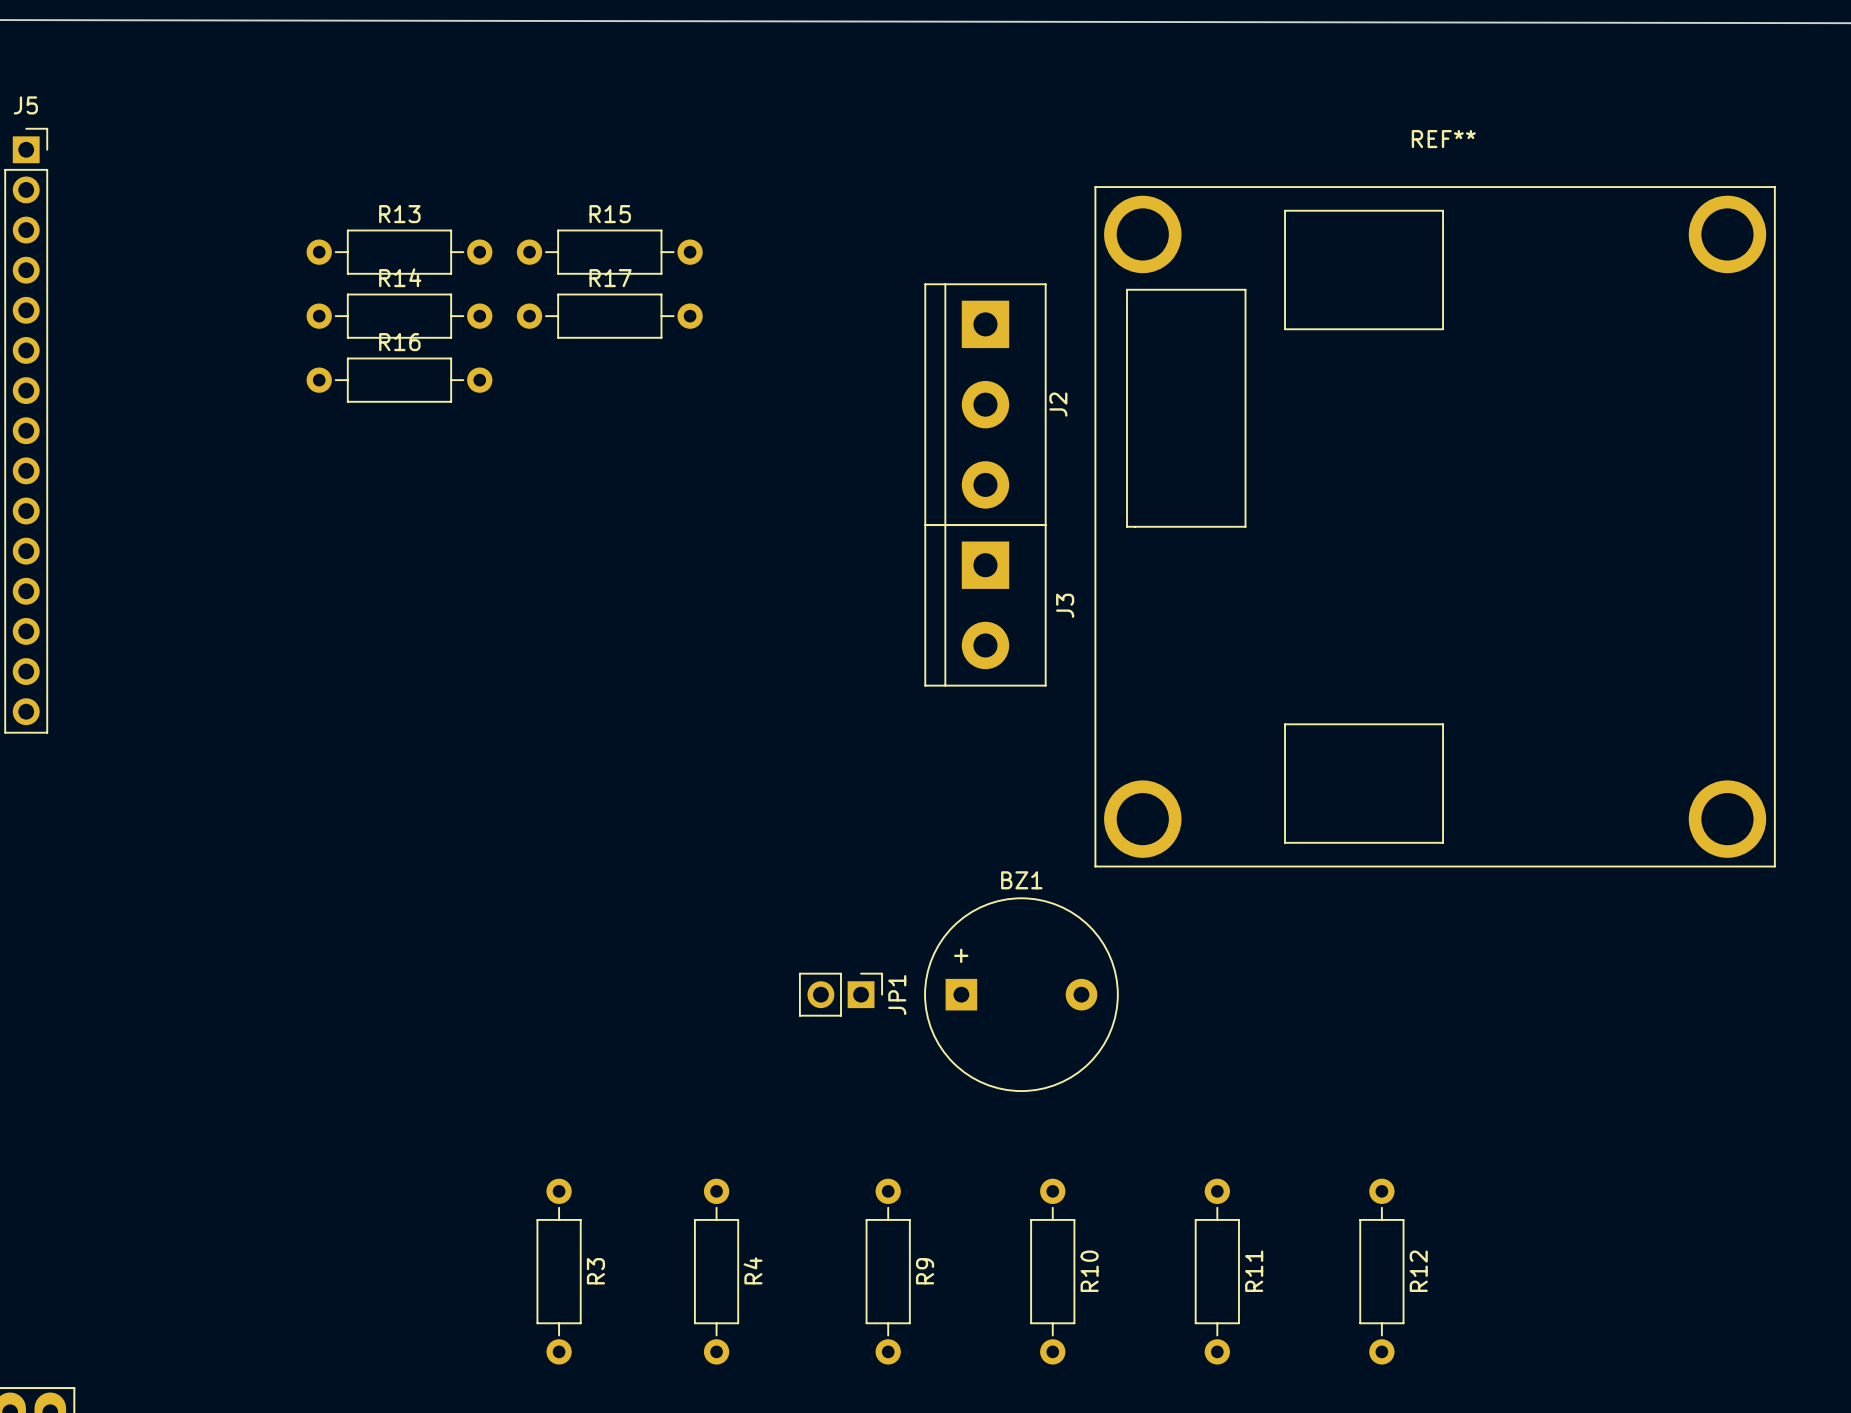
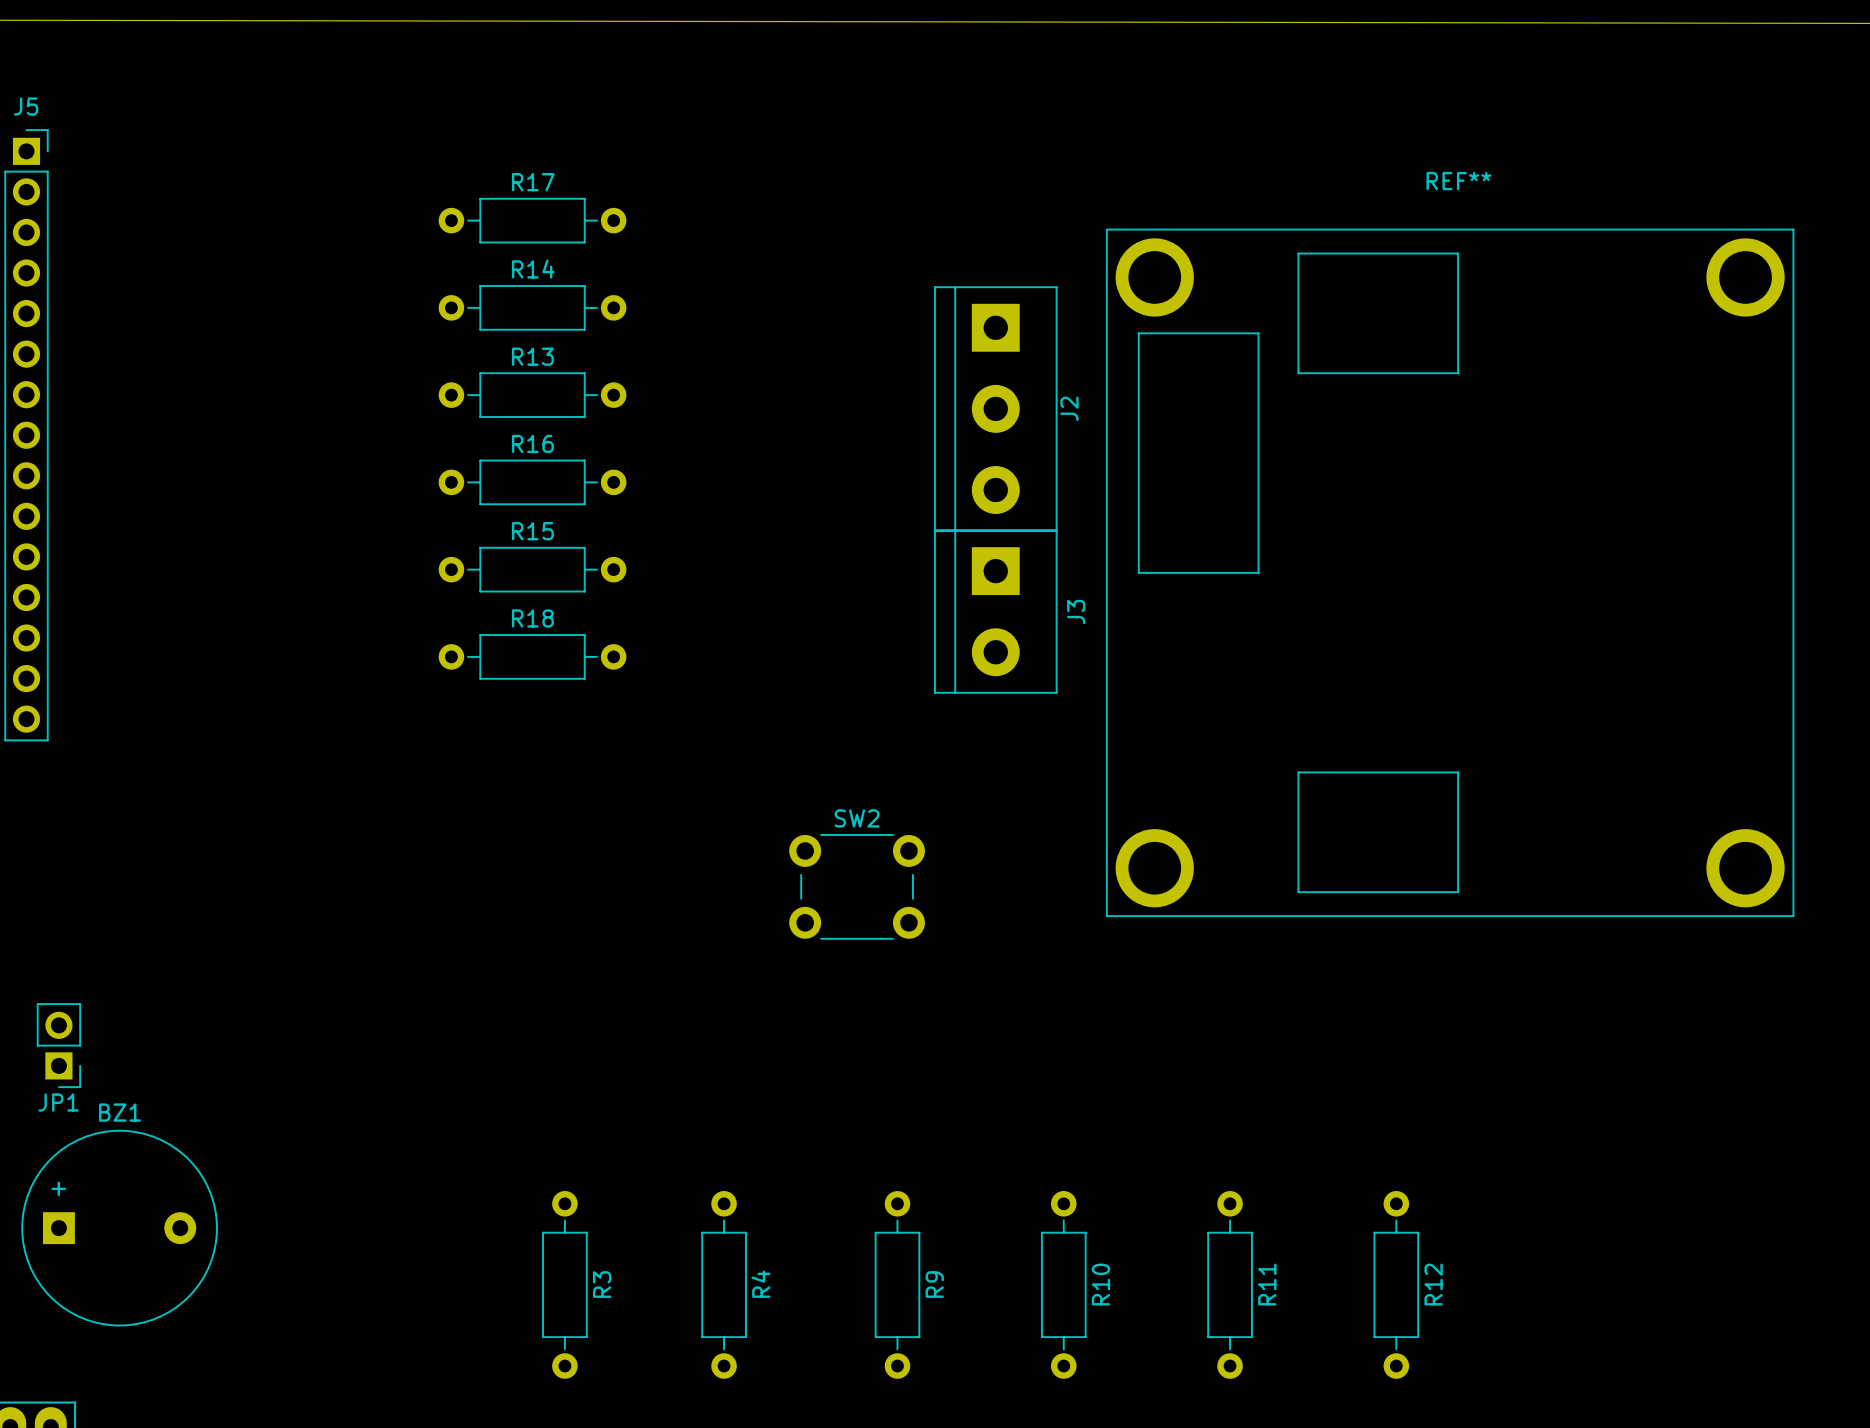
R13 position: (399, 252) -> (532, 395)
R15 position: (609, 252) -> (532, 569)
R14 position: (399, 316) -> (532, 307)
R17 position: (609, 316) -> (532, 220)
R16 position: (399, 380) -> (532, 482)
REF** position: (1435, 526) -> (1450, 572)
R18: none -> (532, 656)
SW2: none -> (857, 886)
JP1 rotation: 0° (840, 994) -> 90° clockwise (58, 1045)
JP1 position: (840, 994) -> (58, 1045)
BZ1 position: (1021, 994) -> (119, 1228)

